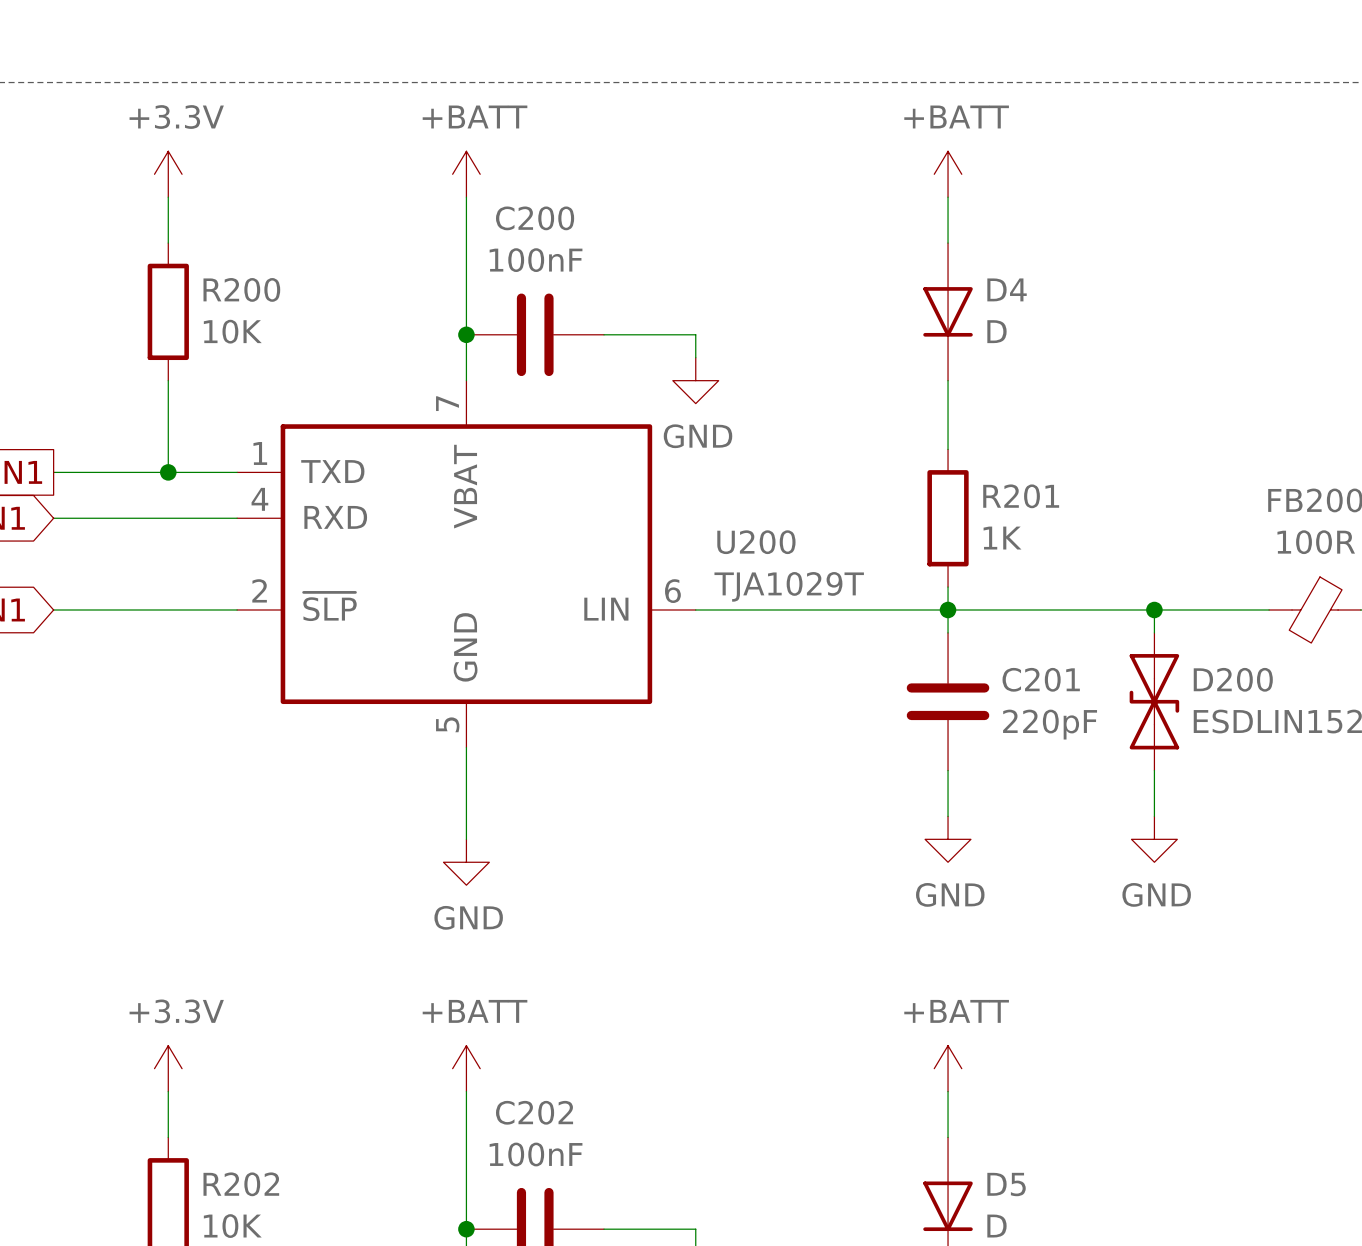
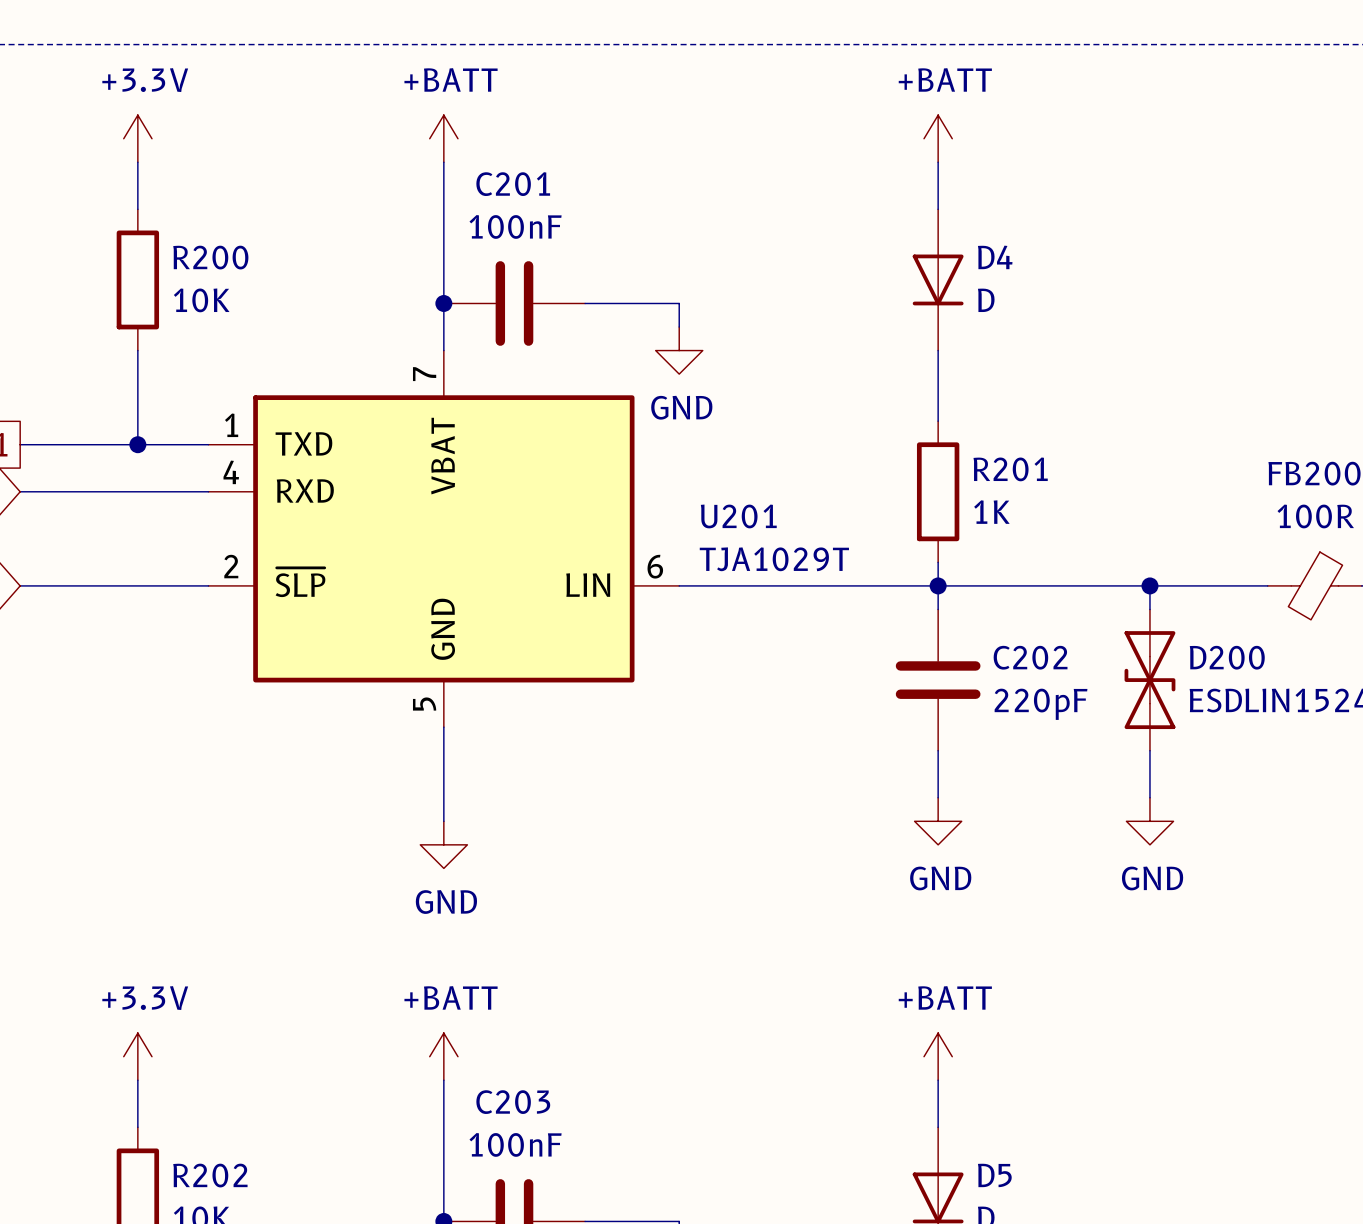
C200 name: C200 (535, 218) -> C201 (513, 184)
U200 name: U200 (756, 542) -> U201 (738, 516)
C201 name: C201 (1041, 679) -> C202 (1030, 657)
C202 name: C202 (534, 1112) -> C203 (513, 1102)

